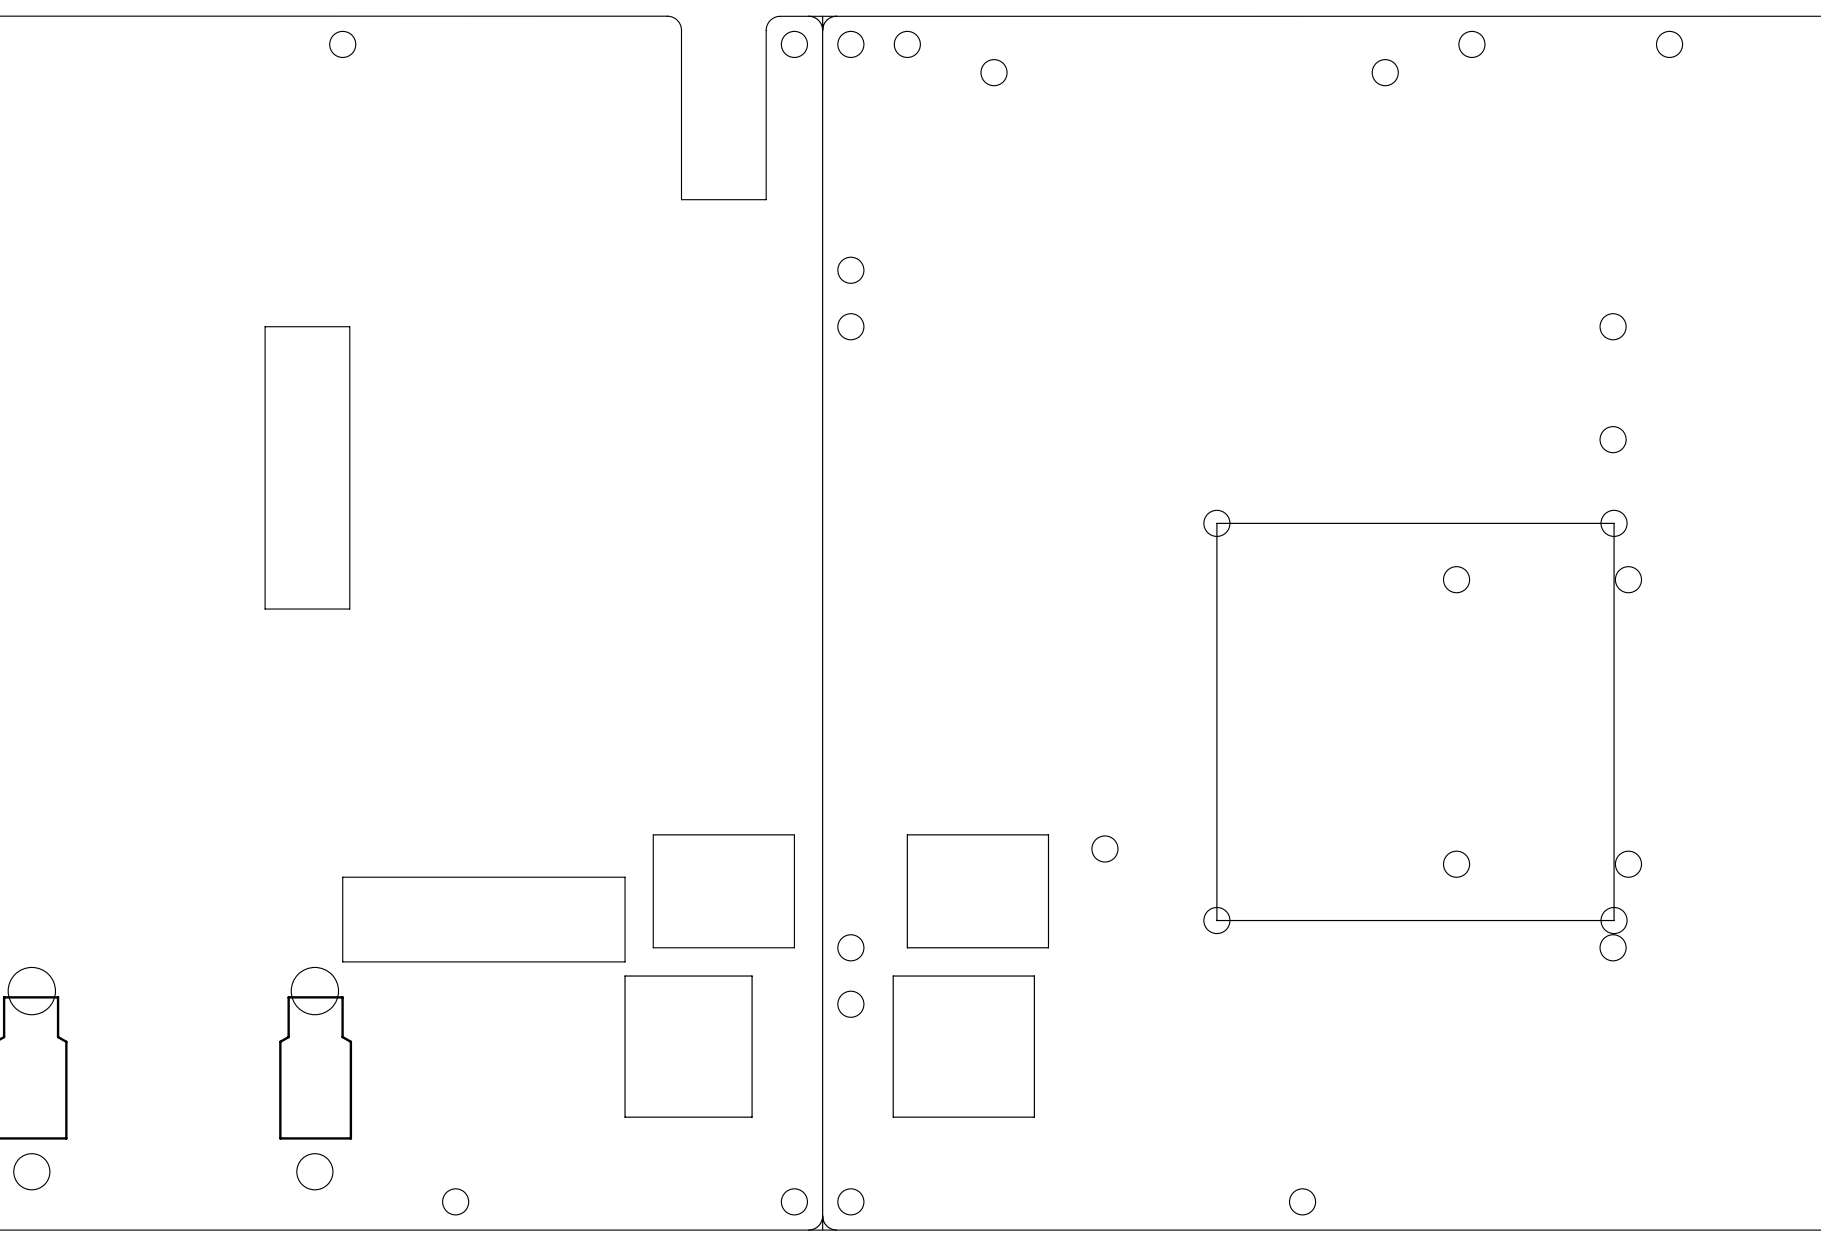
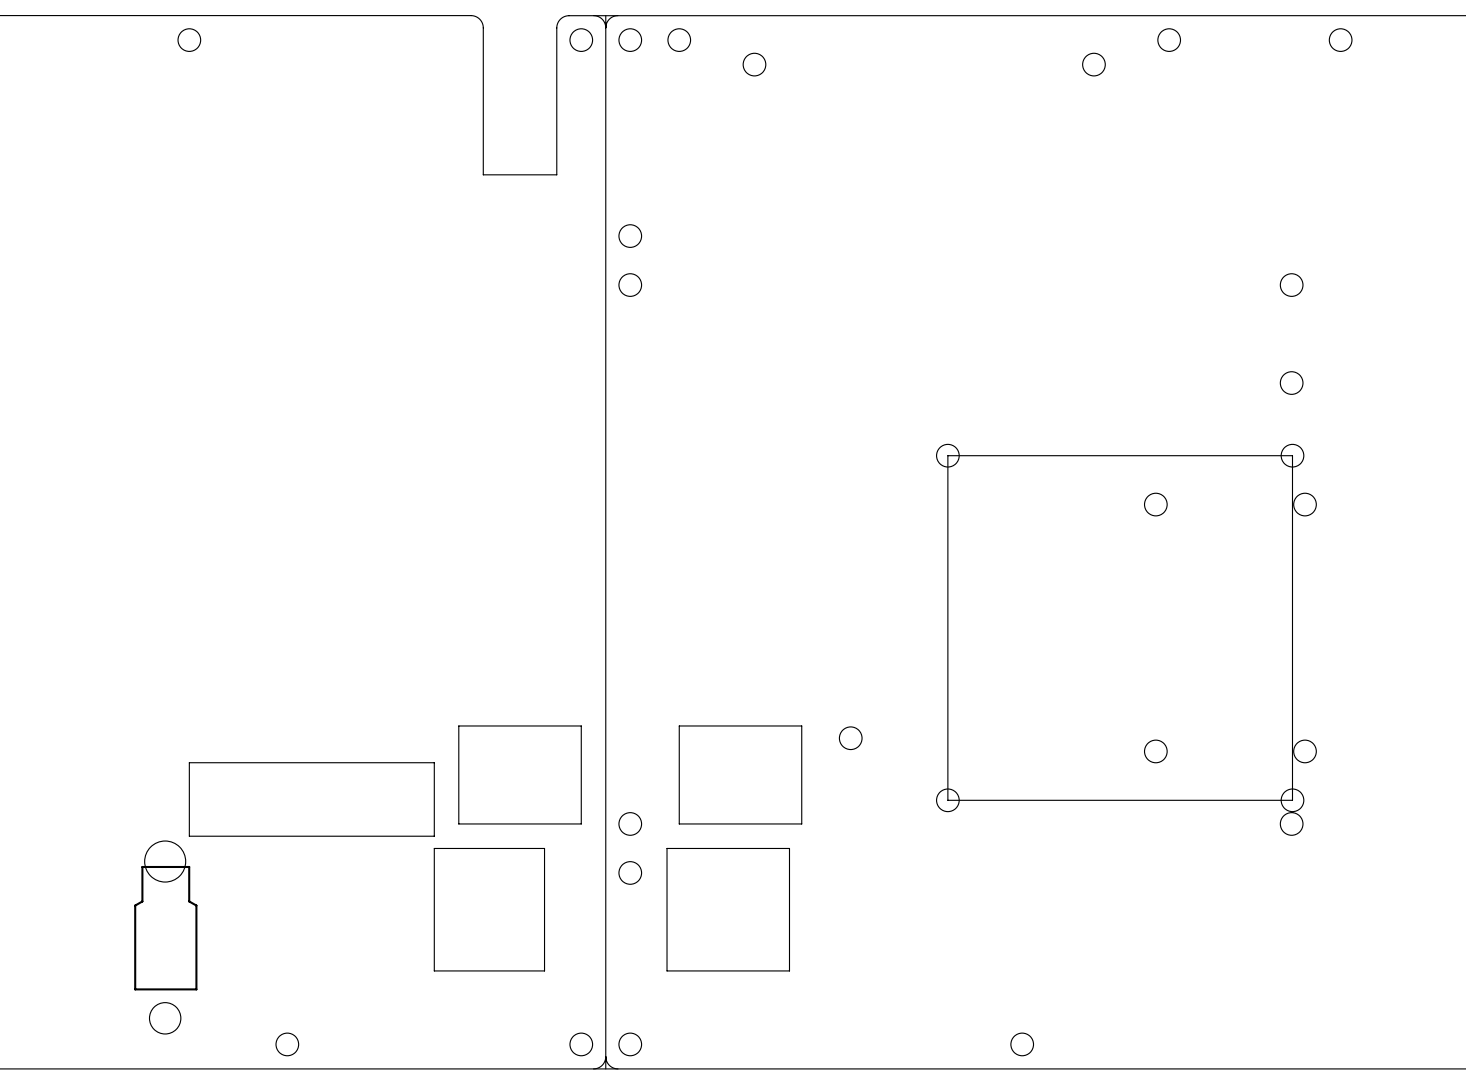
board edge: (265, 326) (349, 326) (349, 609) (265, 609) (265, 326) -> none

